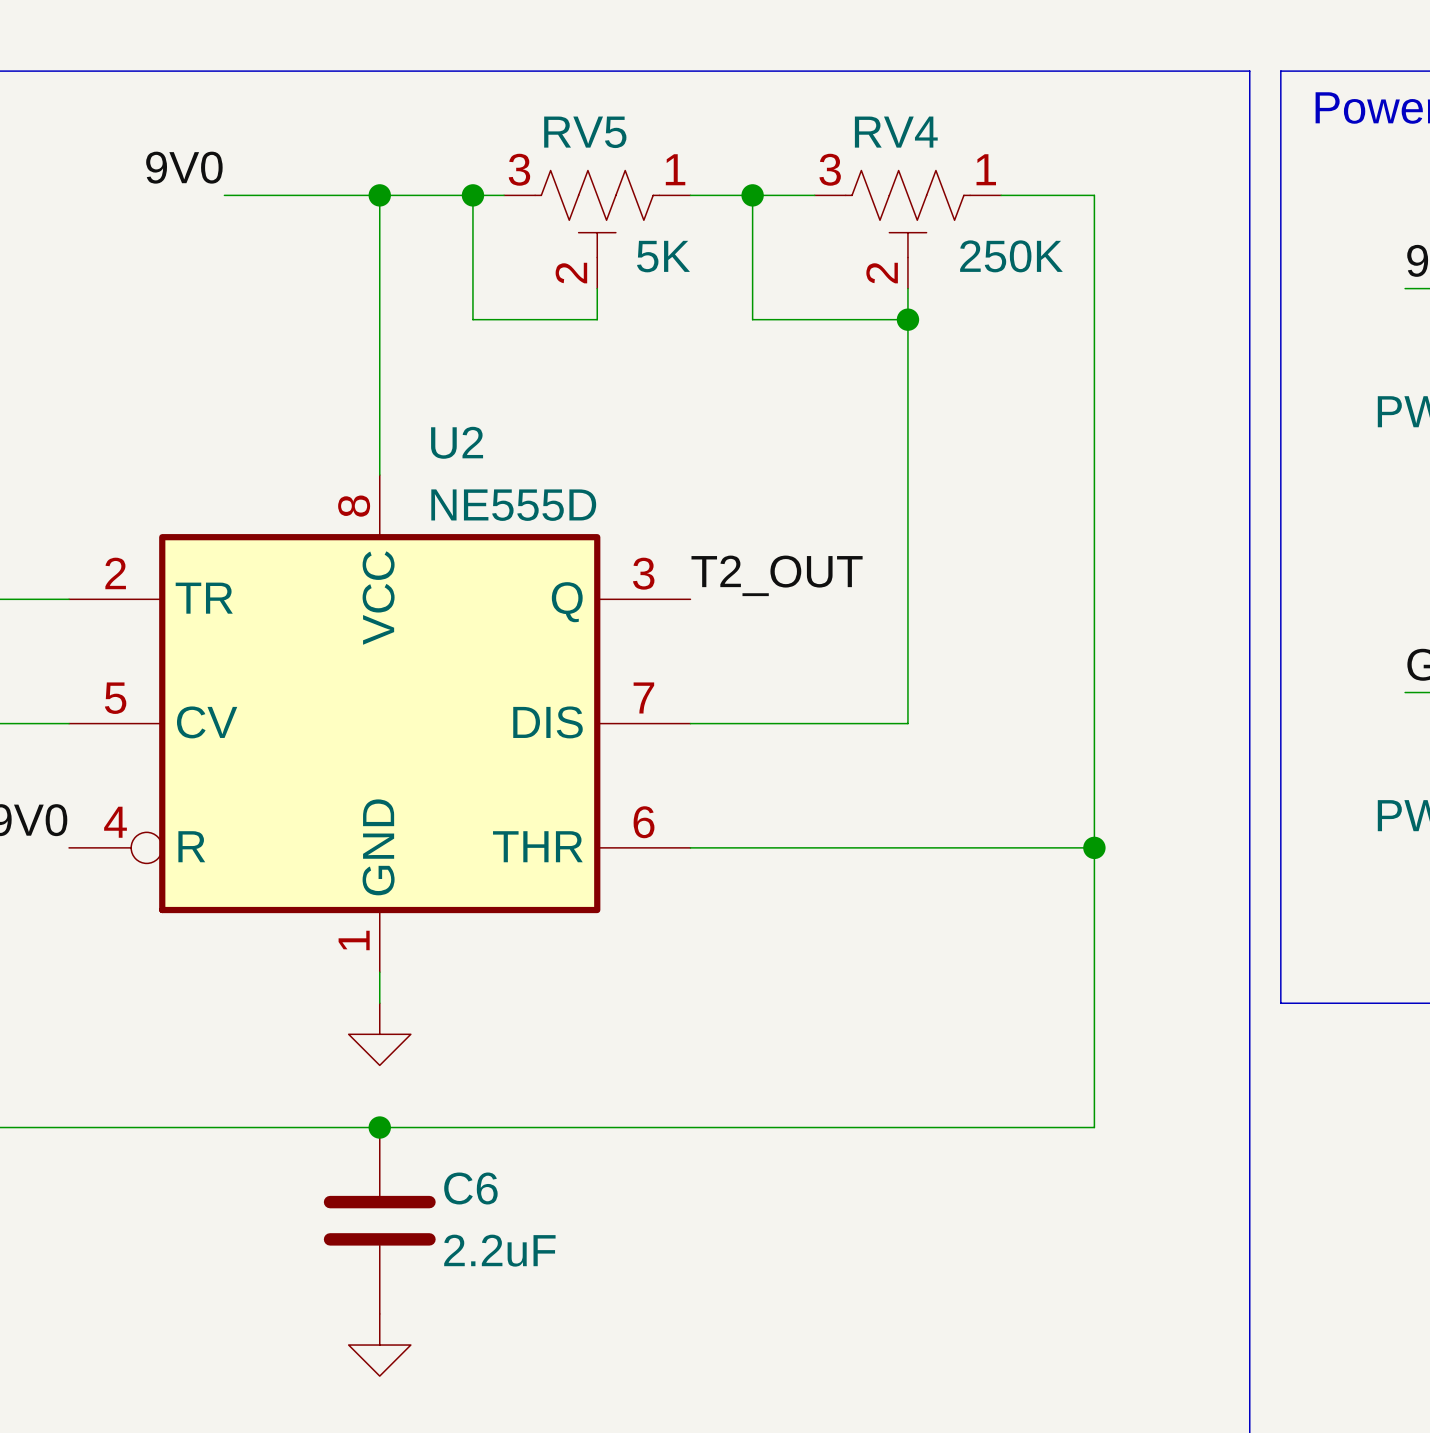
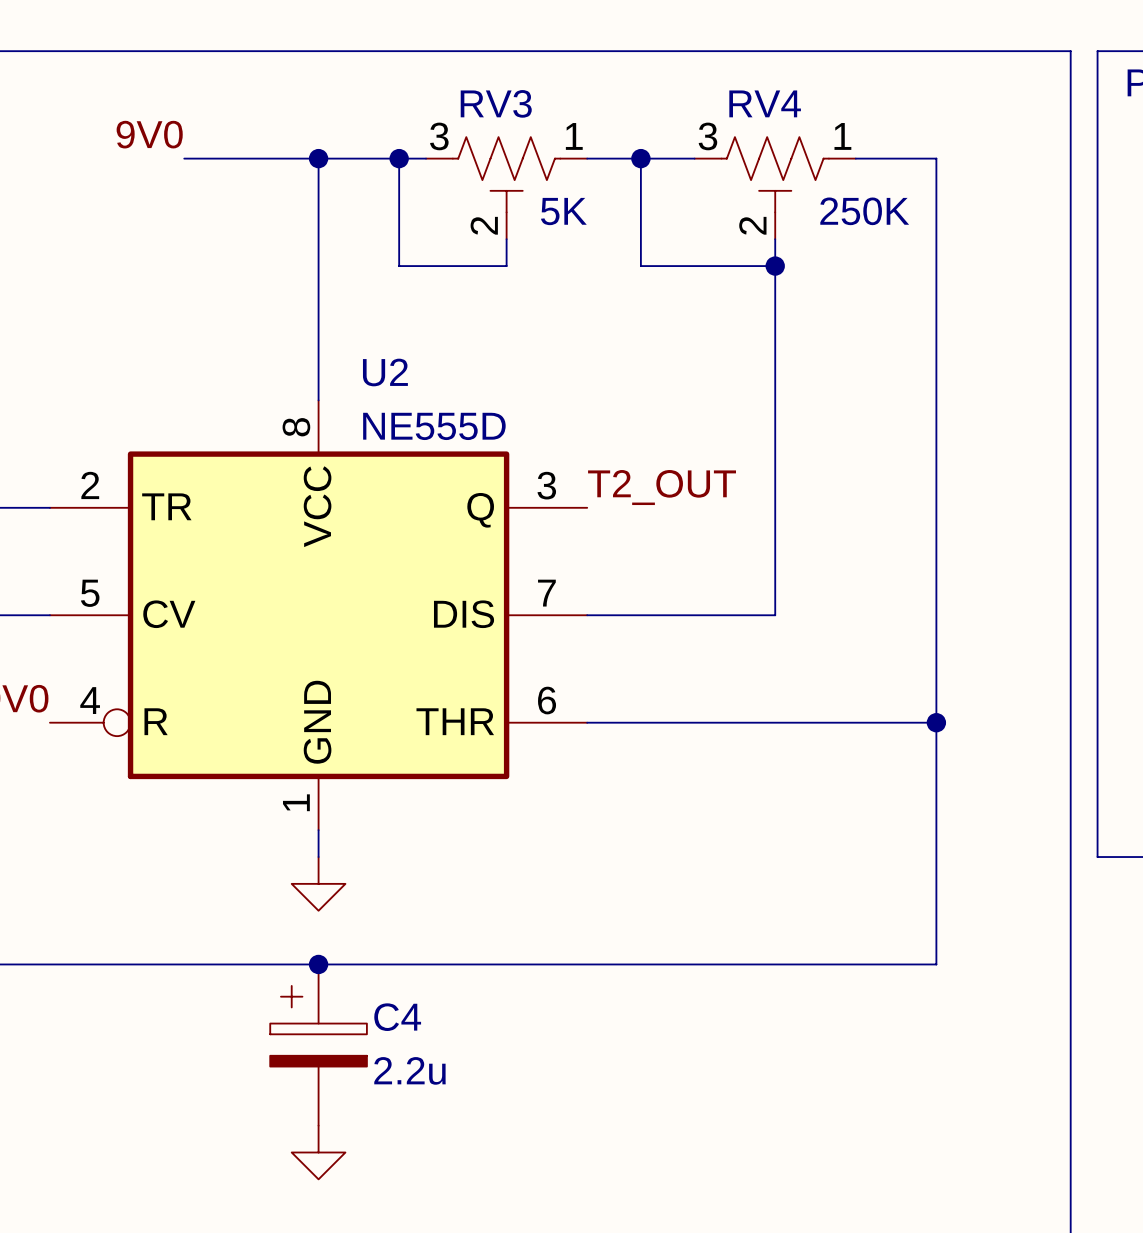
RV5 name: RV5 (585, 132) -> RV3 (496, 103)
C6: 2.2uF (379, 1220) -> none
C4: none -> 2.2u (318, 1045)

